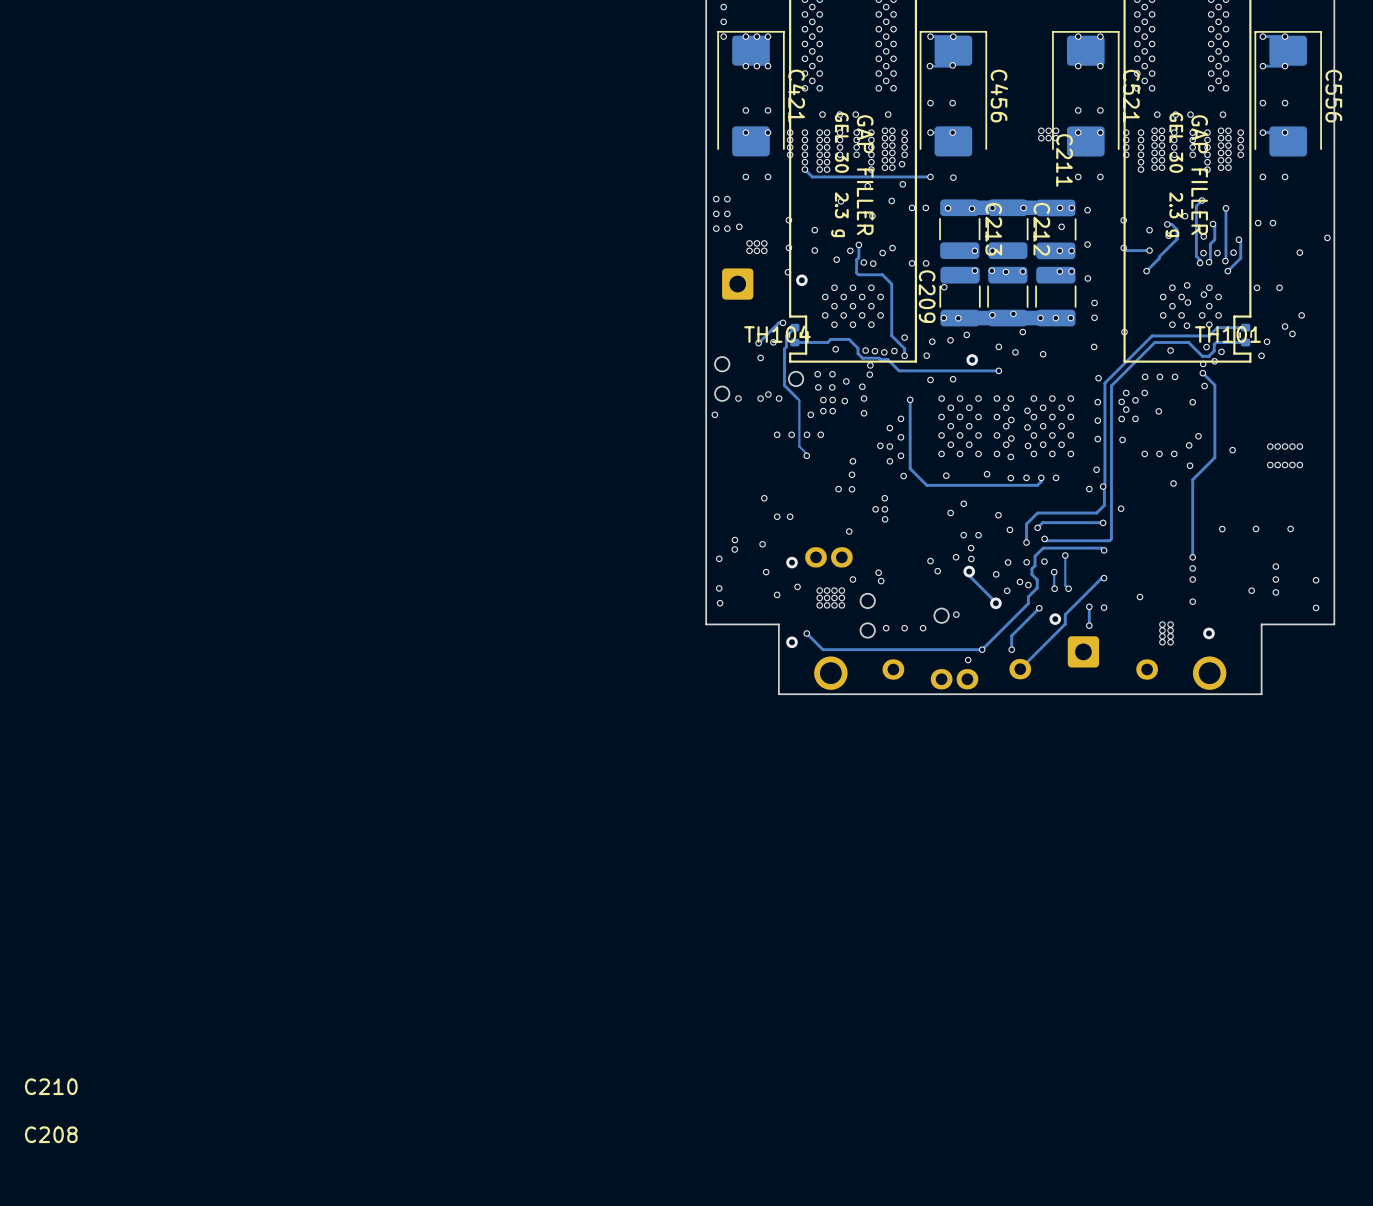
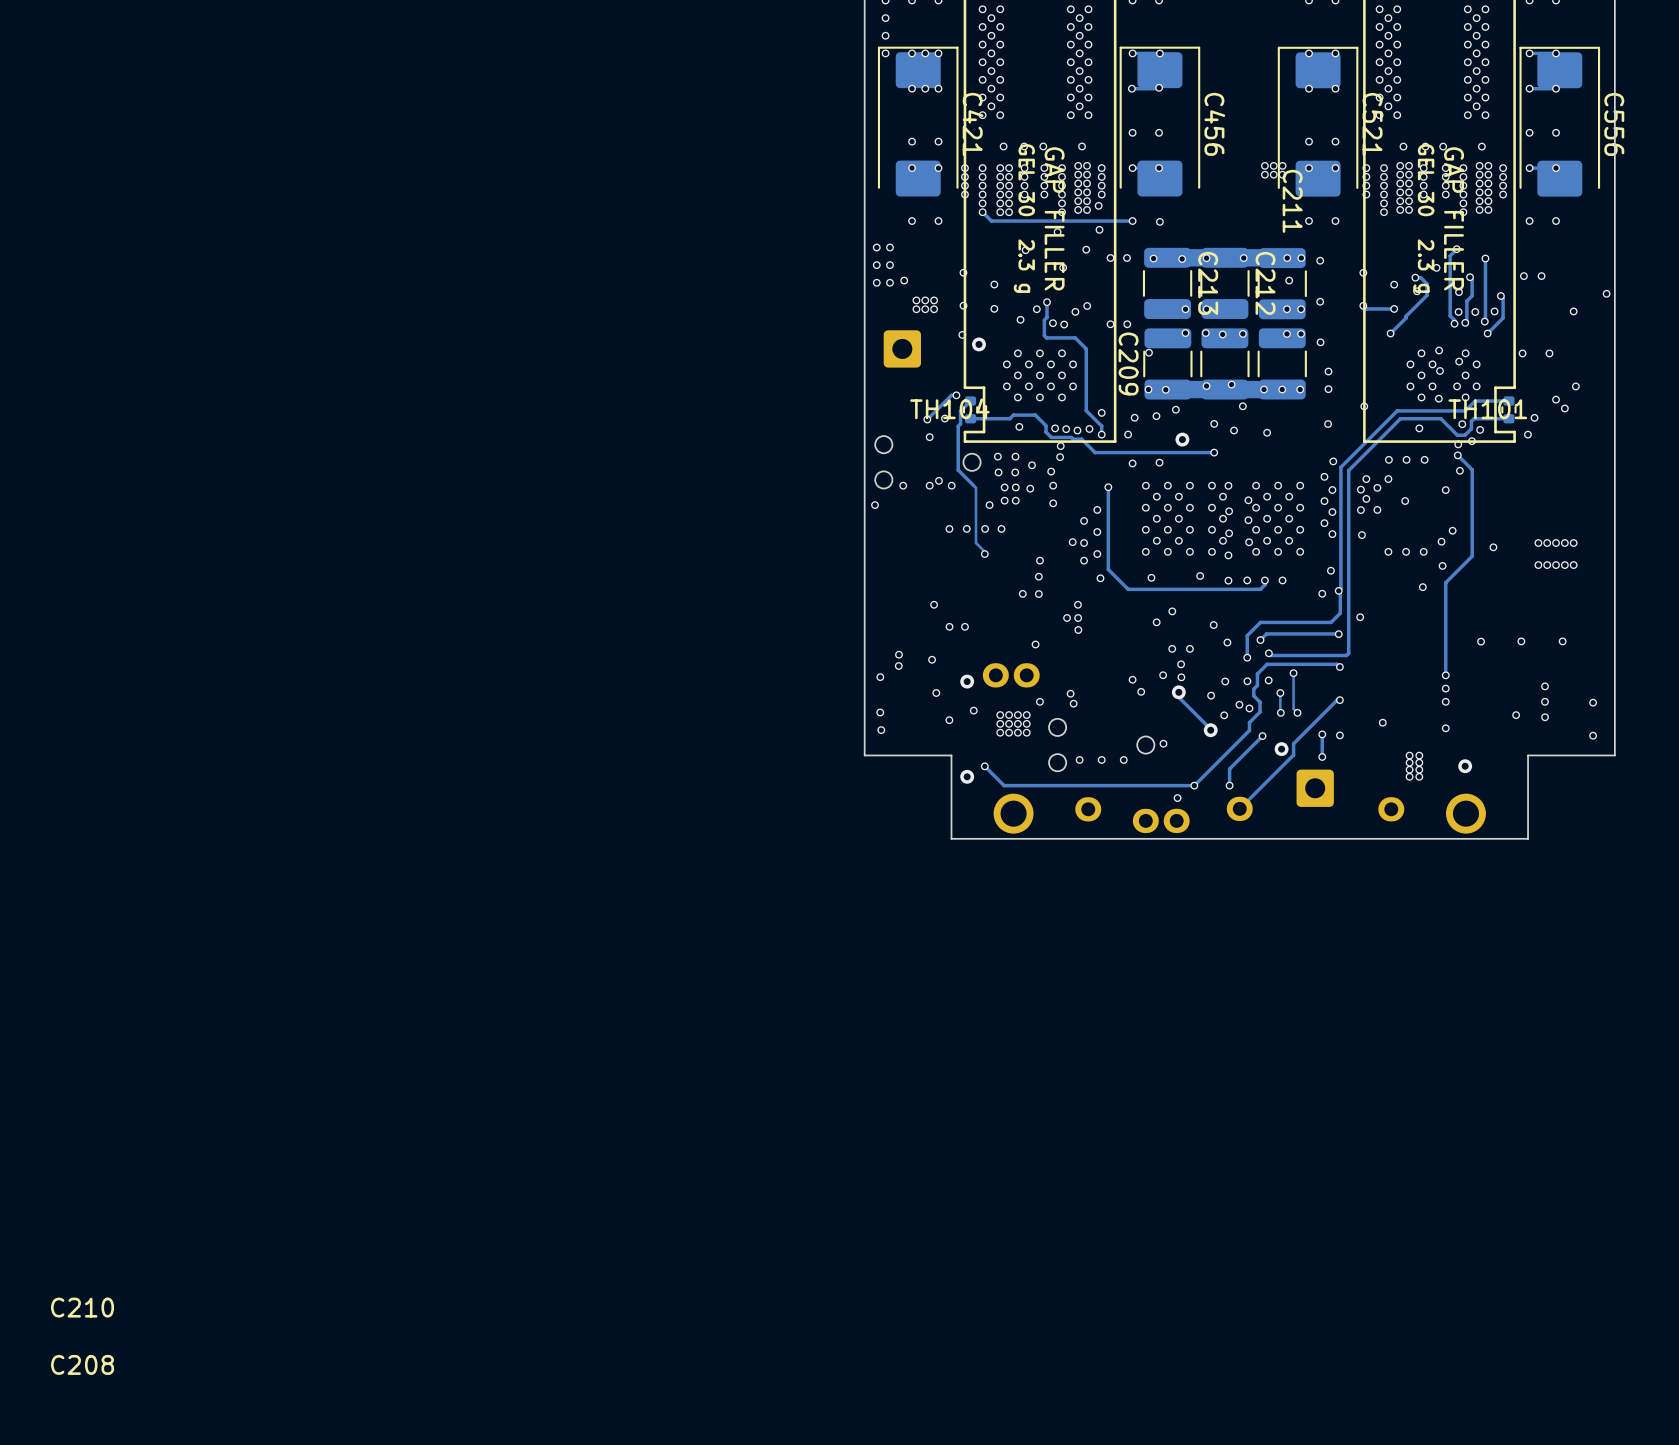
via: none -> (1324, 476)
via: none -> (1324, 501)
via: none -> (1324, 523)

